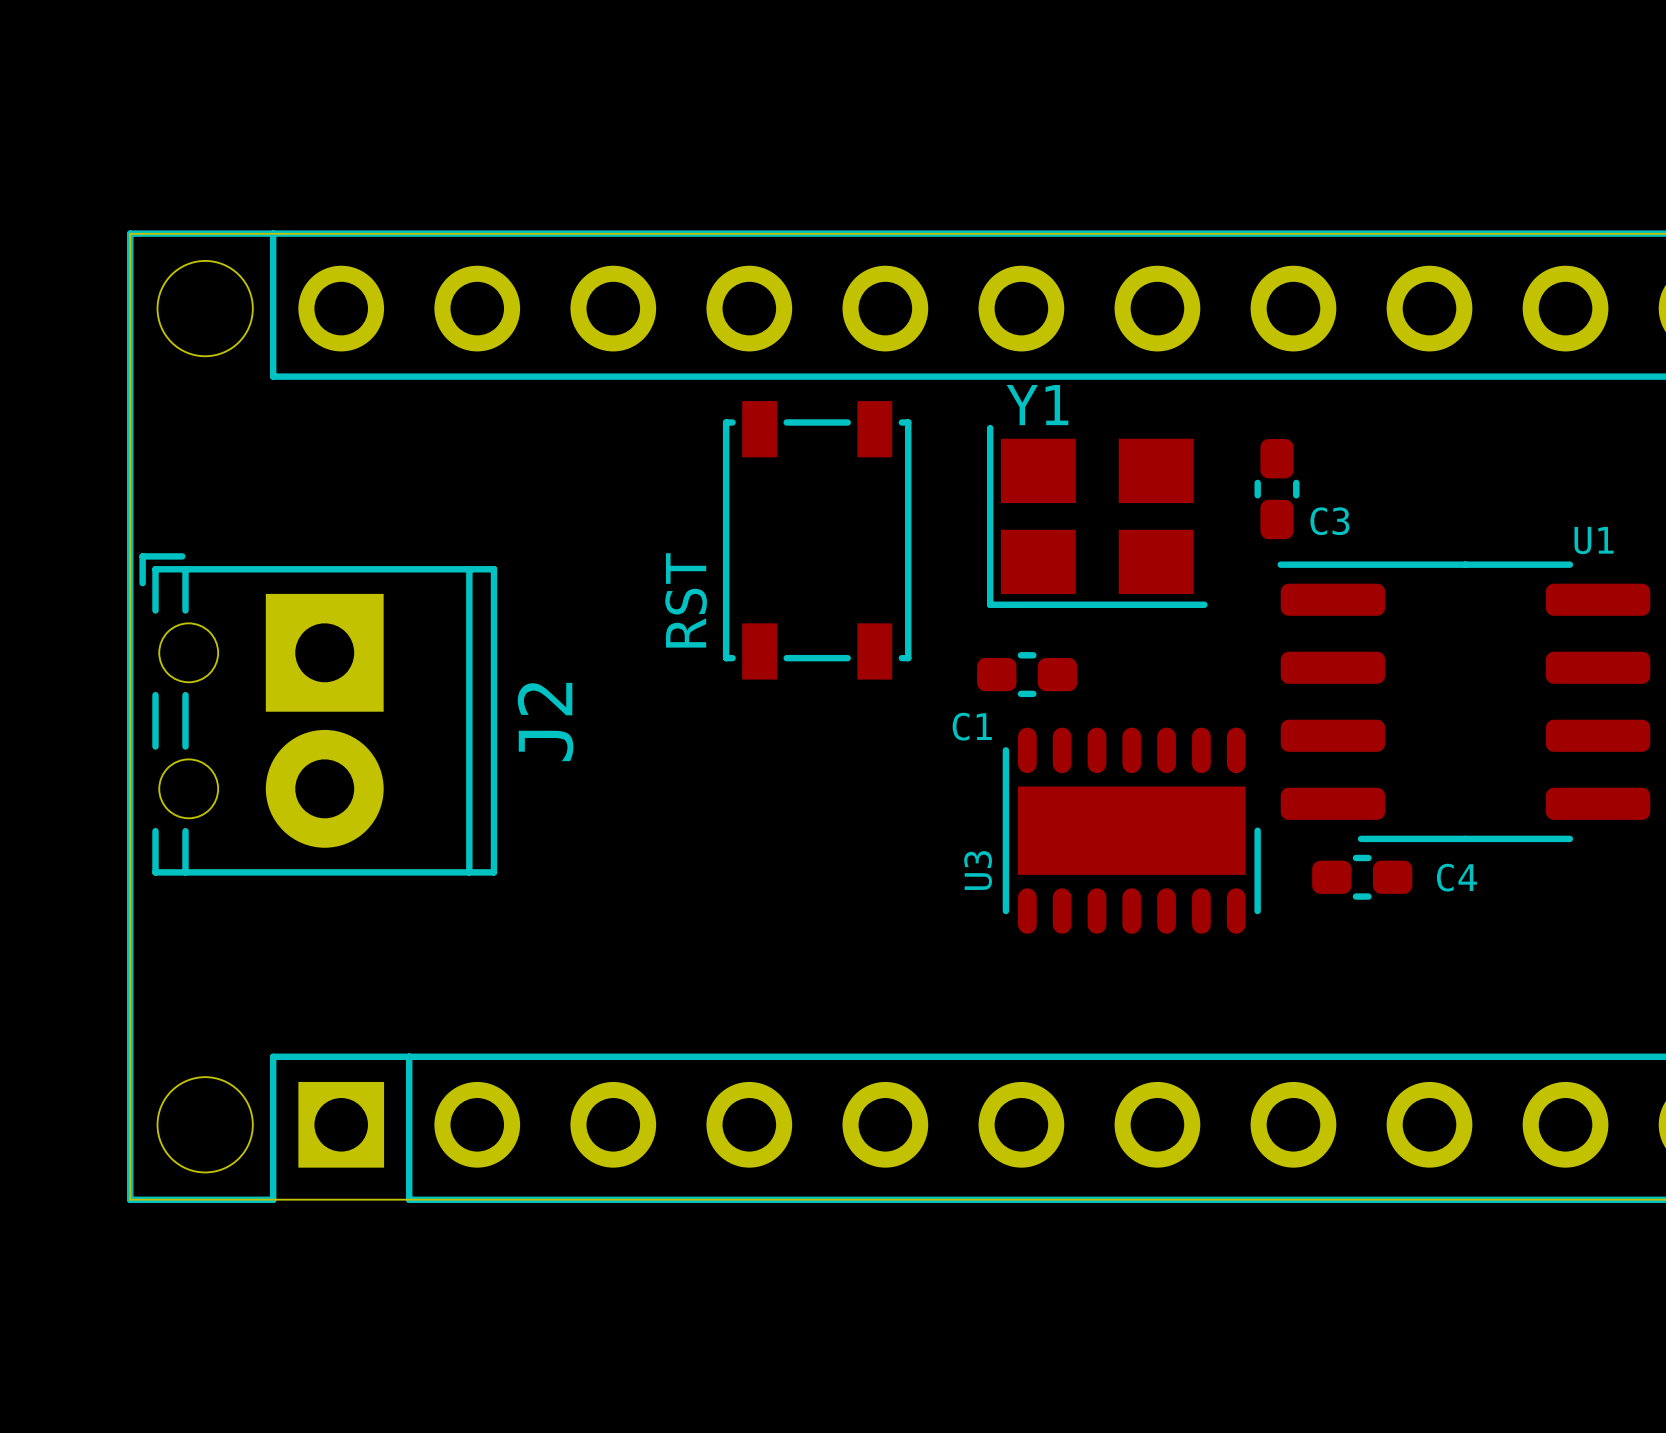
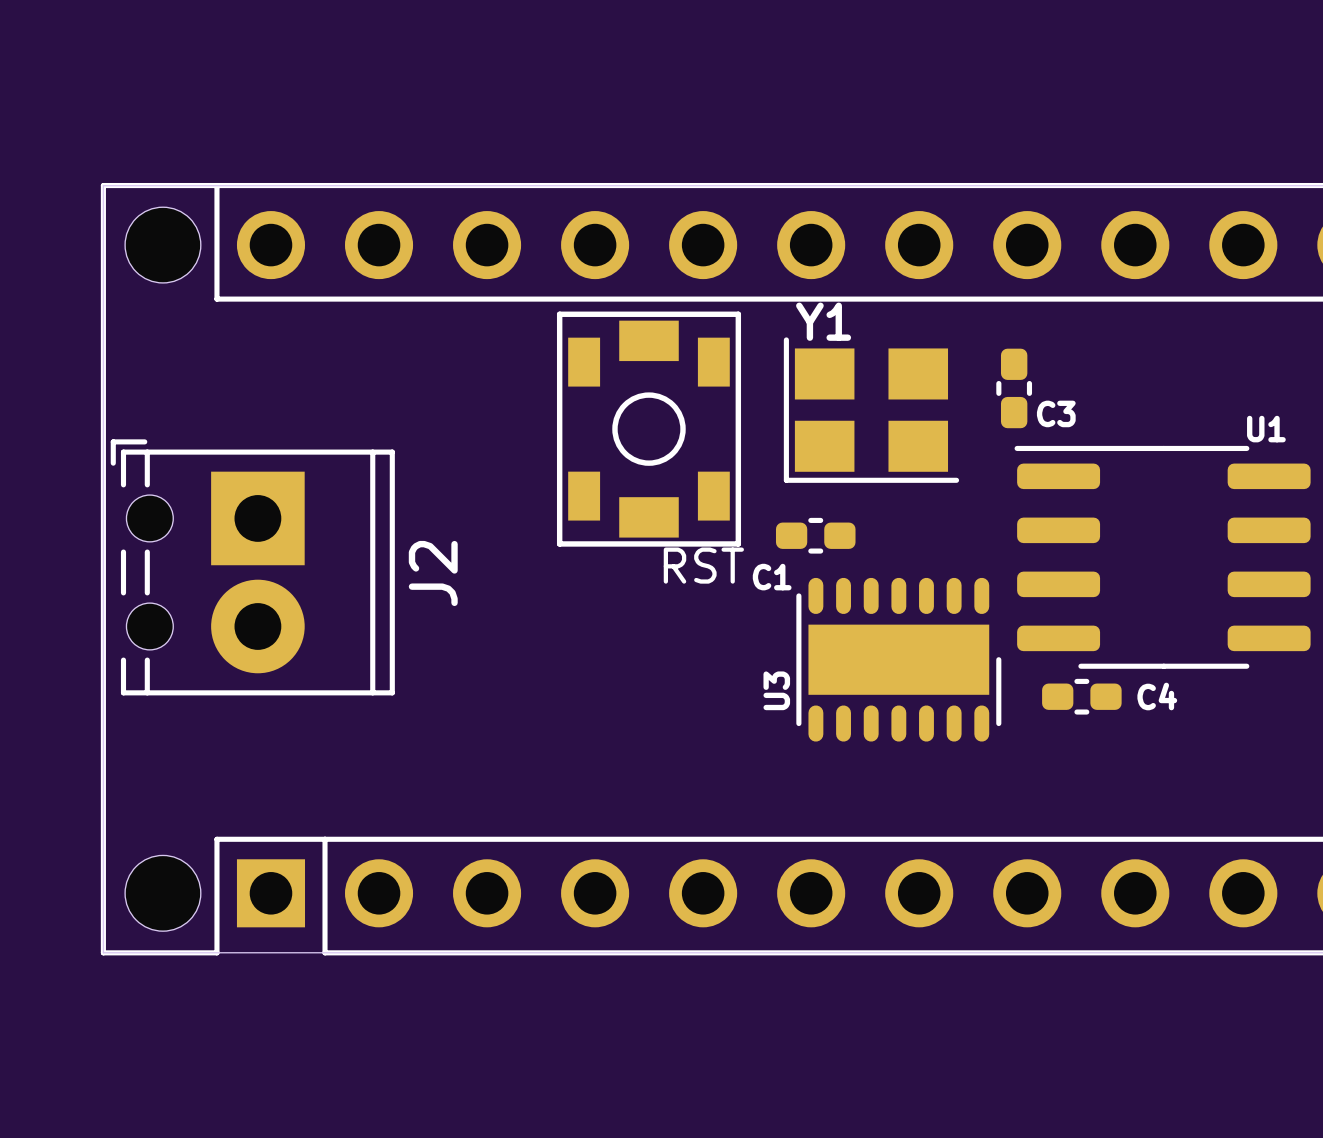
part footprint: [722, 401, 912, 680] -> [556, 311, 742, 547]
text rotation: 0° (686, 600) -> 90° clockwise (703, 565)
text position: RST (686, 600) -> RST (703, 565)

